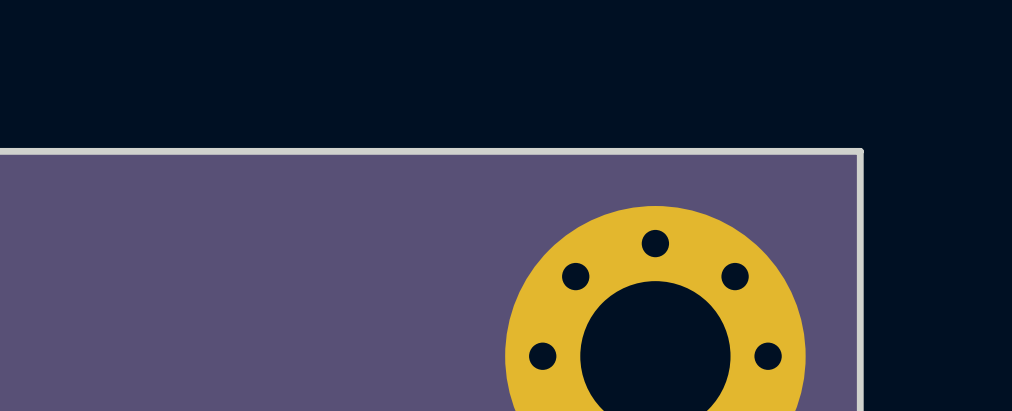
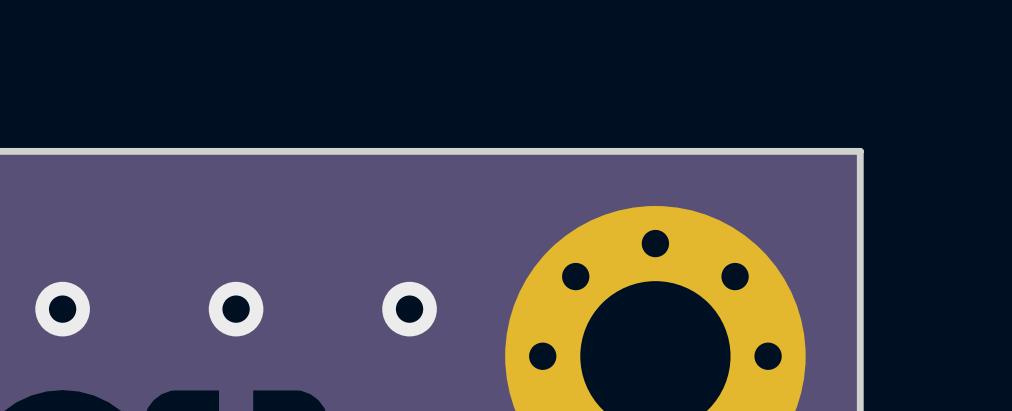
via: none -> (62, 309)
via: none -> (236, 309)
via: none -> (409, 309)

